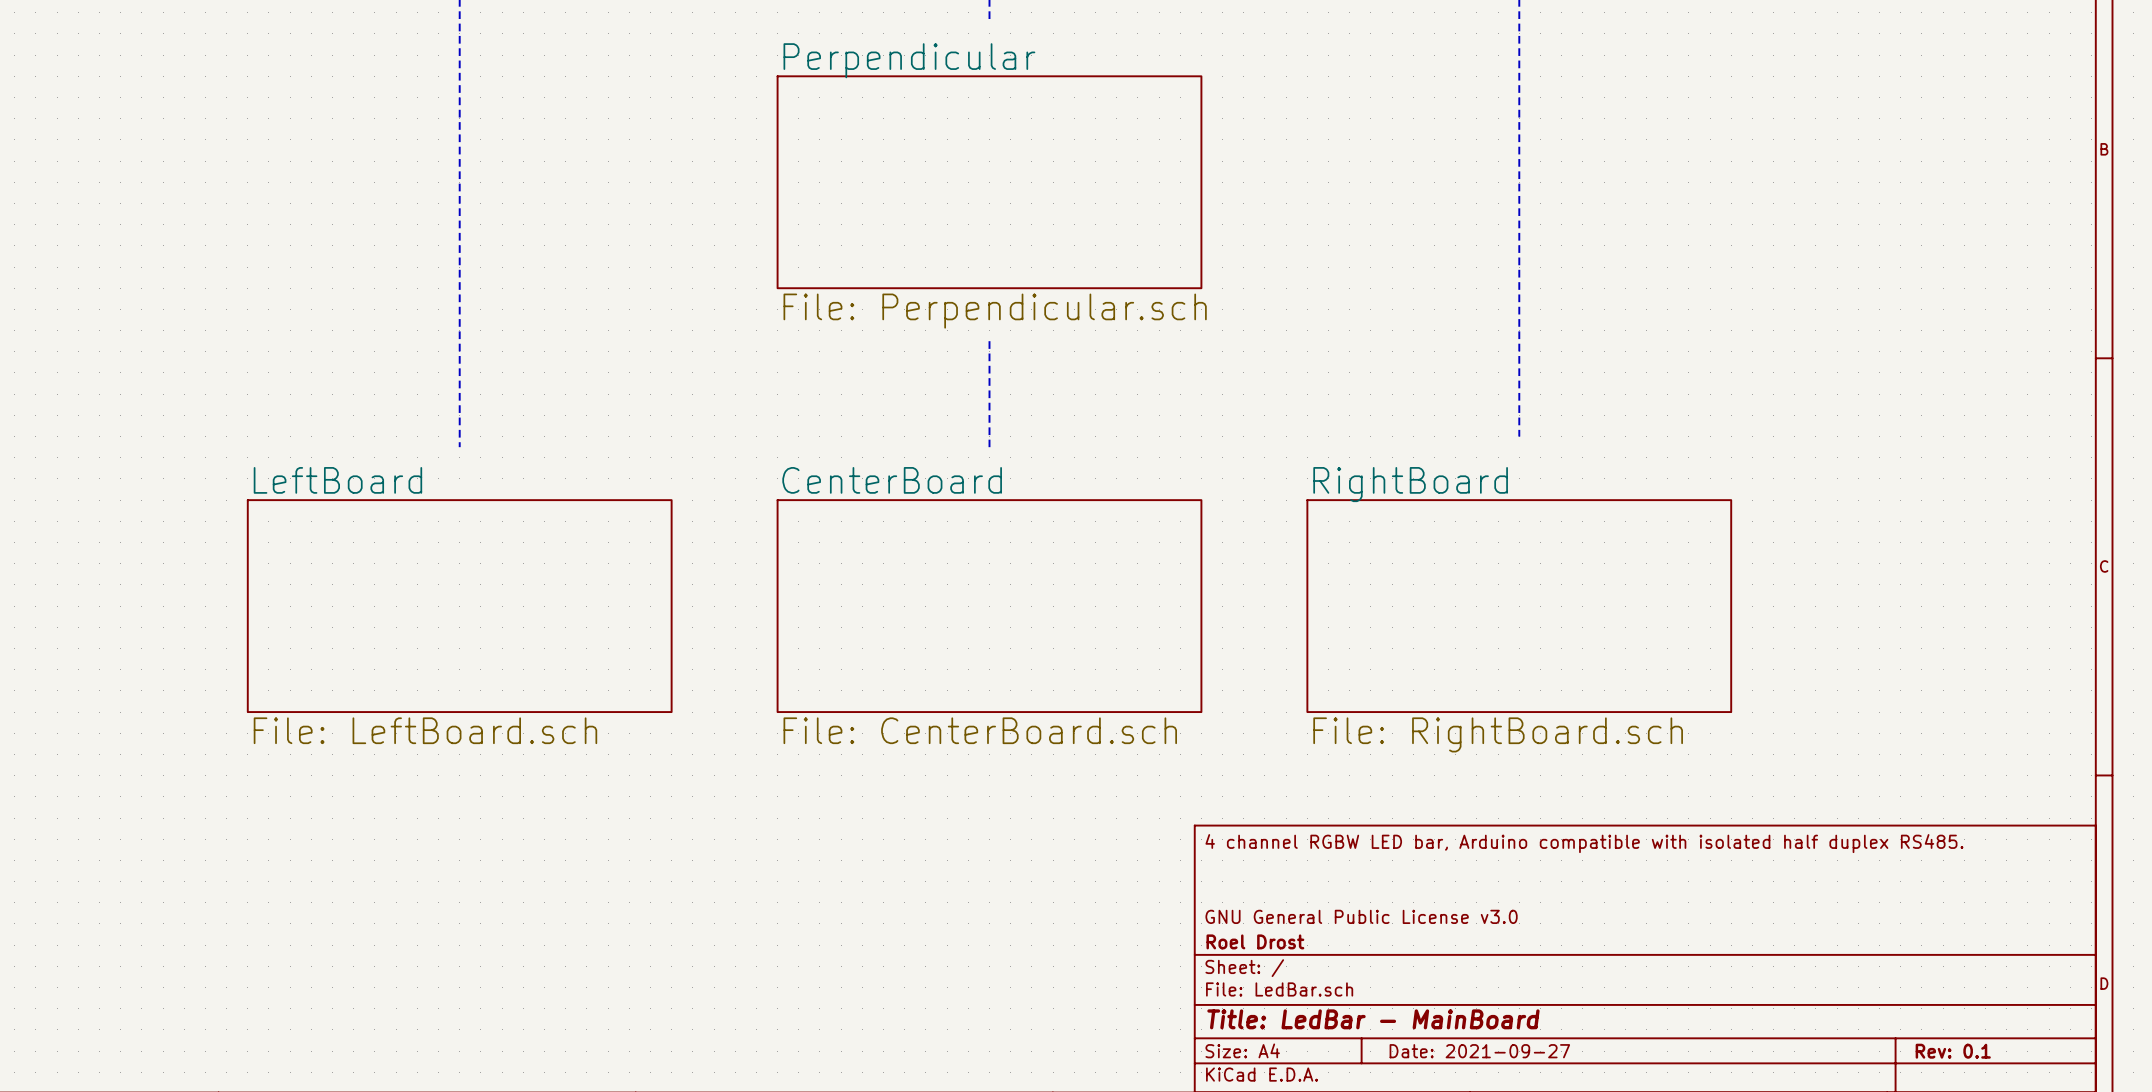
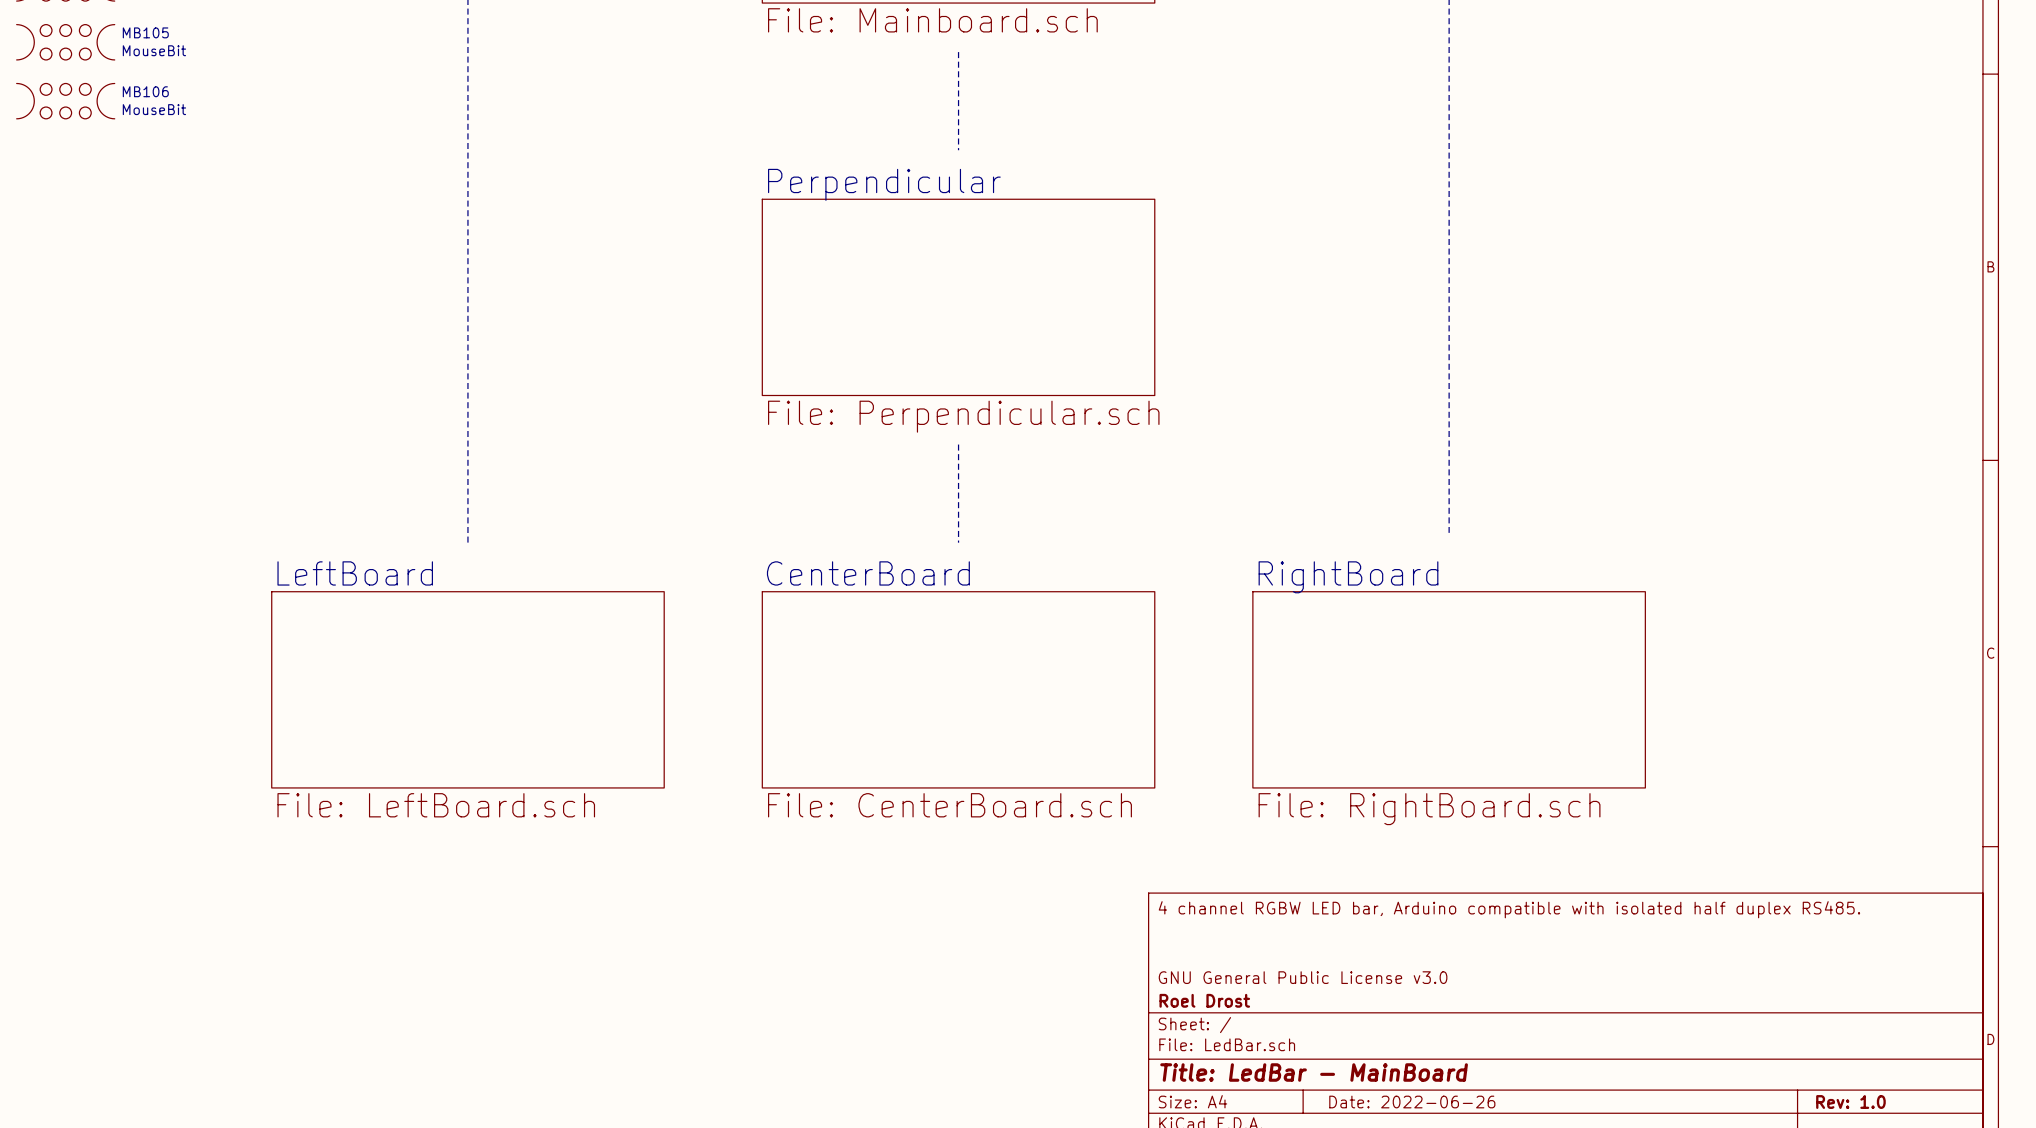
title block: Date: 2021-09-27 (1479, 1051) -> Date: 2022-06-26 (1412, 1102)
title block: Rev: 0.1 (1953, 1051) -> Rev: 1.0 (1850, 1102)

